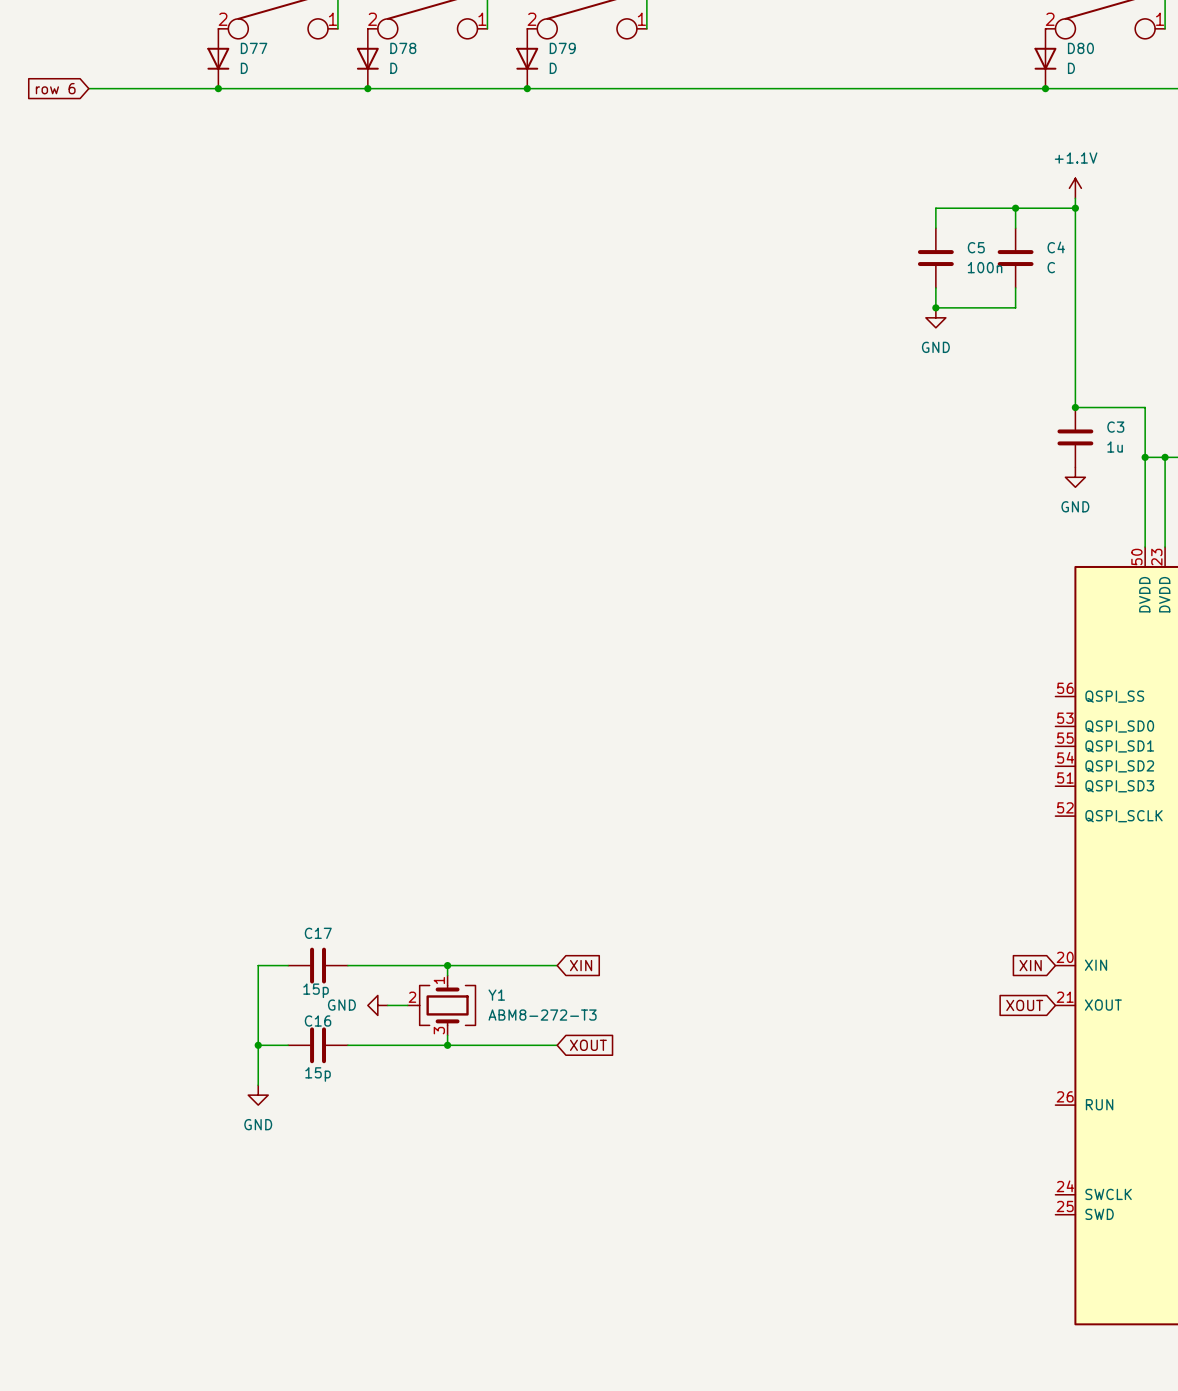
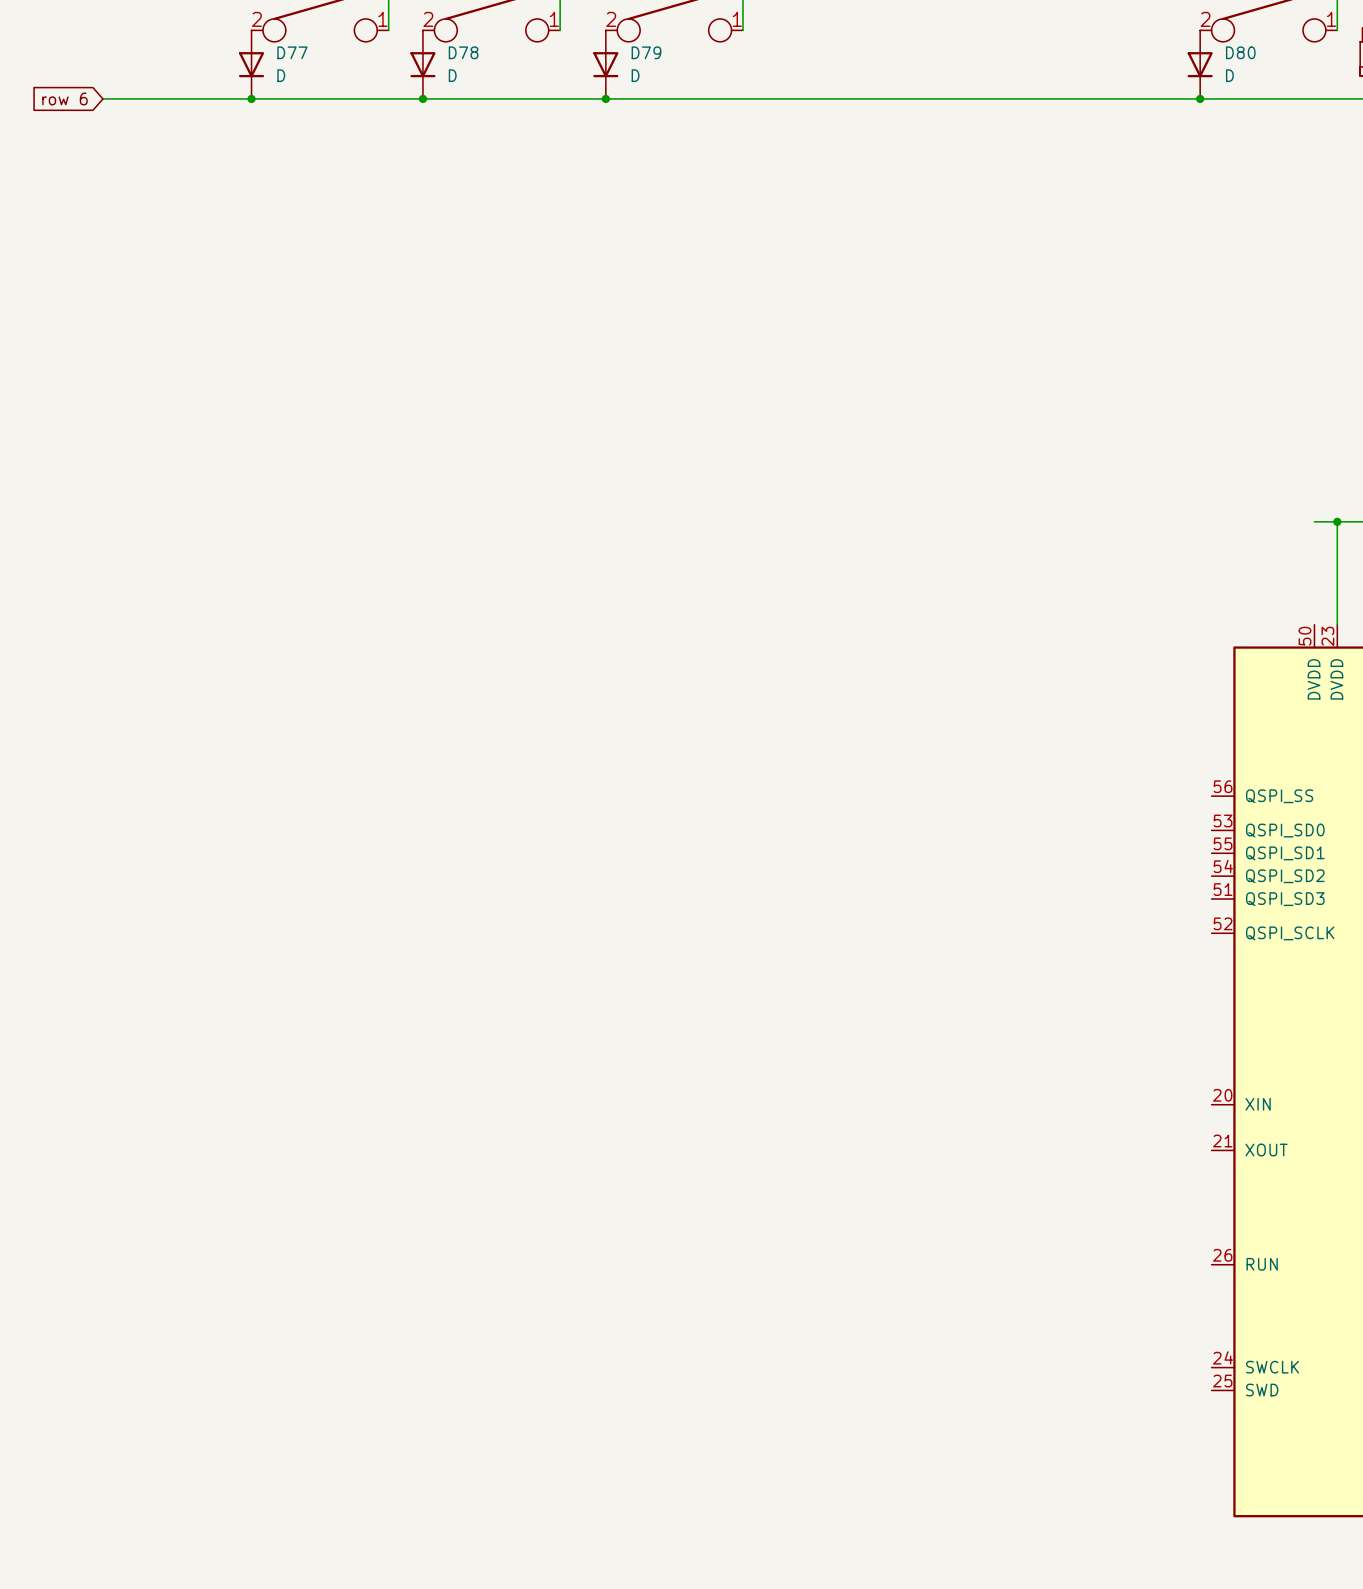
power symbol: +1.1V (1075, 188) -> none
wire: (1075, 198) (1075, 407) (1145, 407) (1145, 547) -> none
wire: (1015, 208) (1015, 228) -> none
junction: (1015, 208) -> none
wire: (1075, 208) (935, 208) (935, 228) -> none
junction: (1075, 208) -> none
C5: 100n (935, 258) -> none
C4: C (1015, 258) -> none
wire: (935, 287) (935, 307) (1015, 307) (1015, 287) -> none
junction: (935, 307) -> none
power symbol: GND (935, 317) -> none
junction: (1075, 407) -> none
C3: 1u (1075, 437) -> none
junction: (1145, 457) -> none
power symbol: GND (1075, 477) -> none
wire: (288, 965) (258, 965) (258, 1085) -> none
C17: 15p (318, 965) -> none
wire: (347, 965) (557, 965) -> none
wire: (447, 965) (447, 975) -> none
junction: (447, 965) -> none
global label: XIN (581, 965) -> none
global label: XIN (1030, 965) -> none
power symbol: GND (377, 1005) -> none
wire: (387, 1005) (407, 1005) -> none
Y1: ABM8-272-T3 (441, 1005) -> none
global label: XOUT (1024, 1005) -> none
wire: (447, 1035) (447, 1045) -> none
wire: (258, 1045) (288, 1045) -> none
junction: (258, 1045) -> none
C16: 15p (318, 1045) -> none
wire: (347, 1045) (557, 1045) -> none
junction: (447, 1045) -> none
global label: XOUT (588, 1045) -> none
power symbol: GND (258, 1095) -> none

